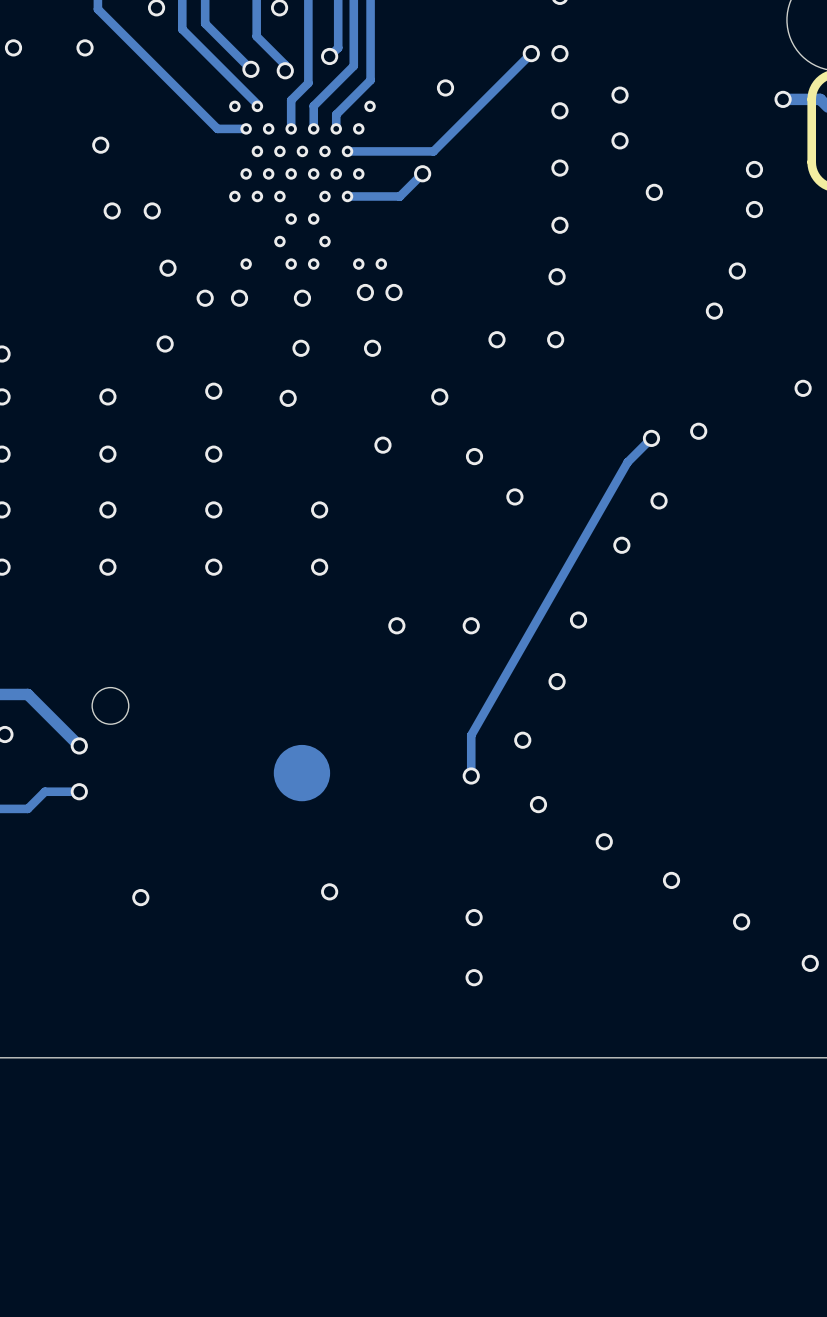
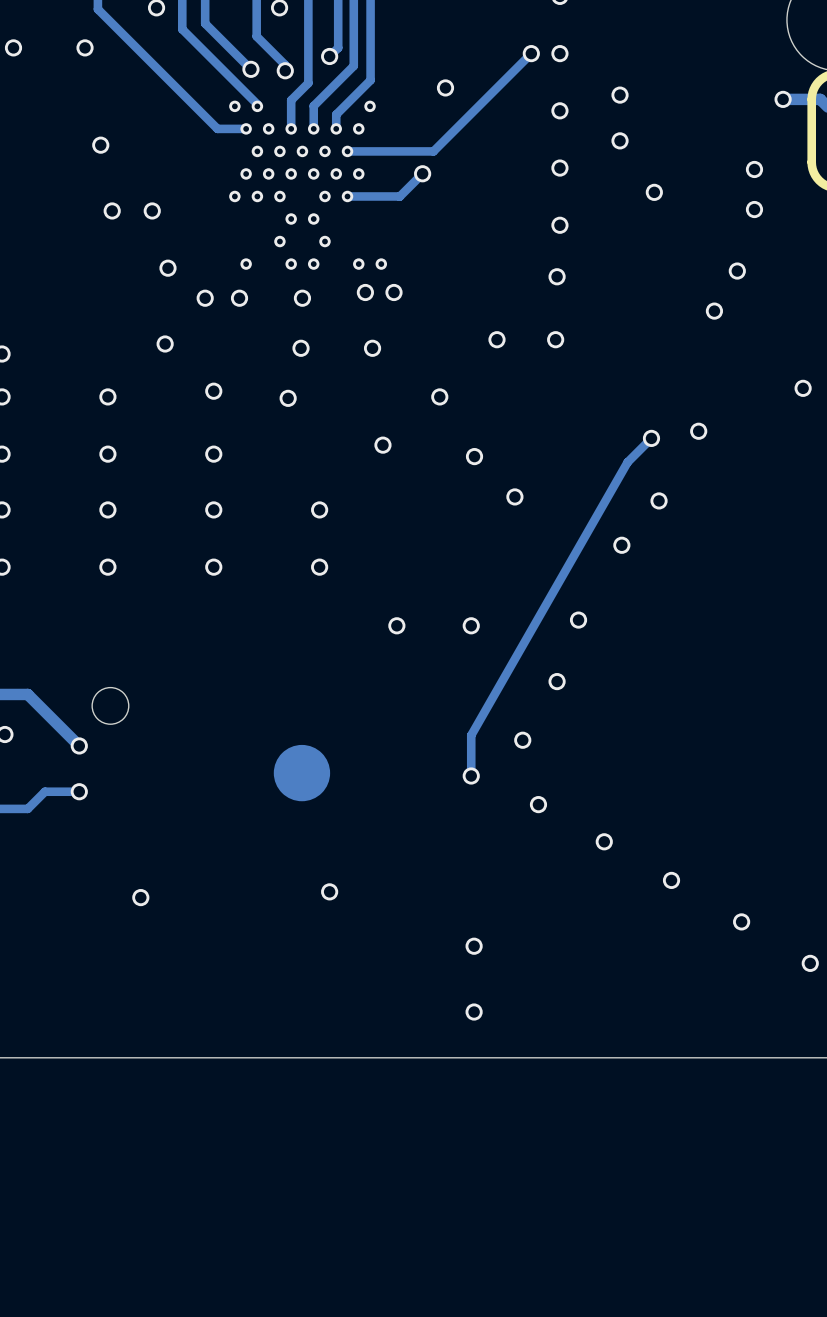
via: (474, 917) -> none
via: none -> (474, 946)
via: (474, 977) -> none
via: none -> (474, 1012)

